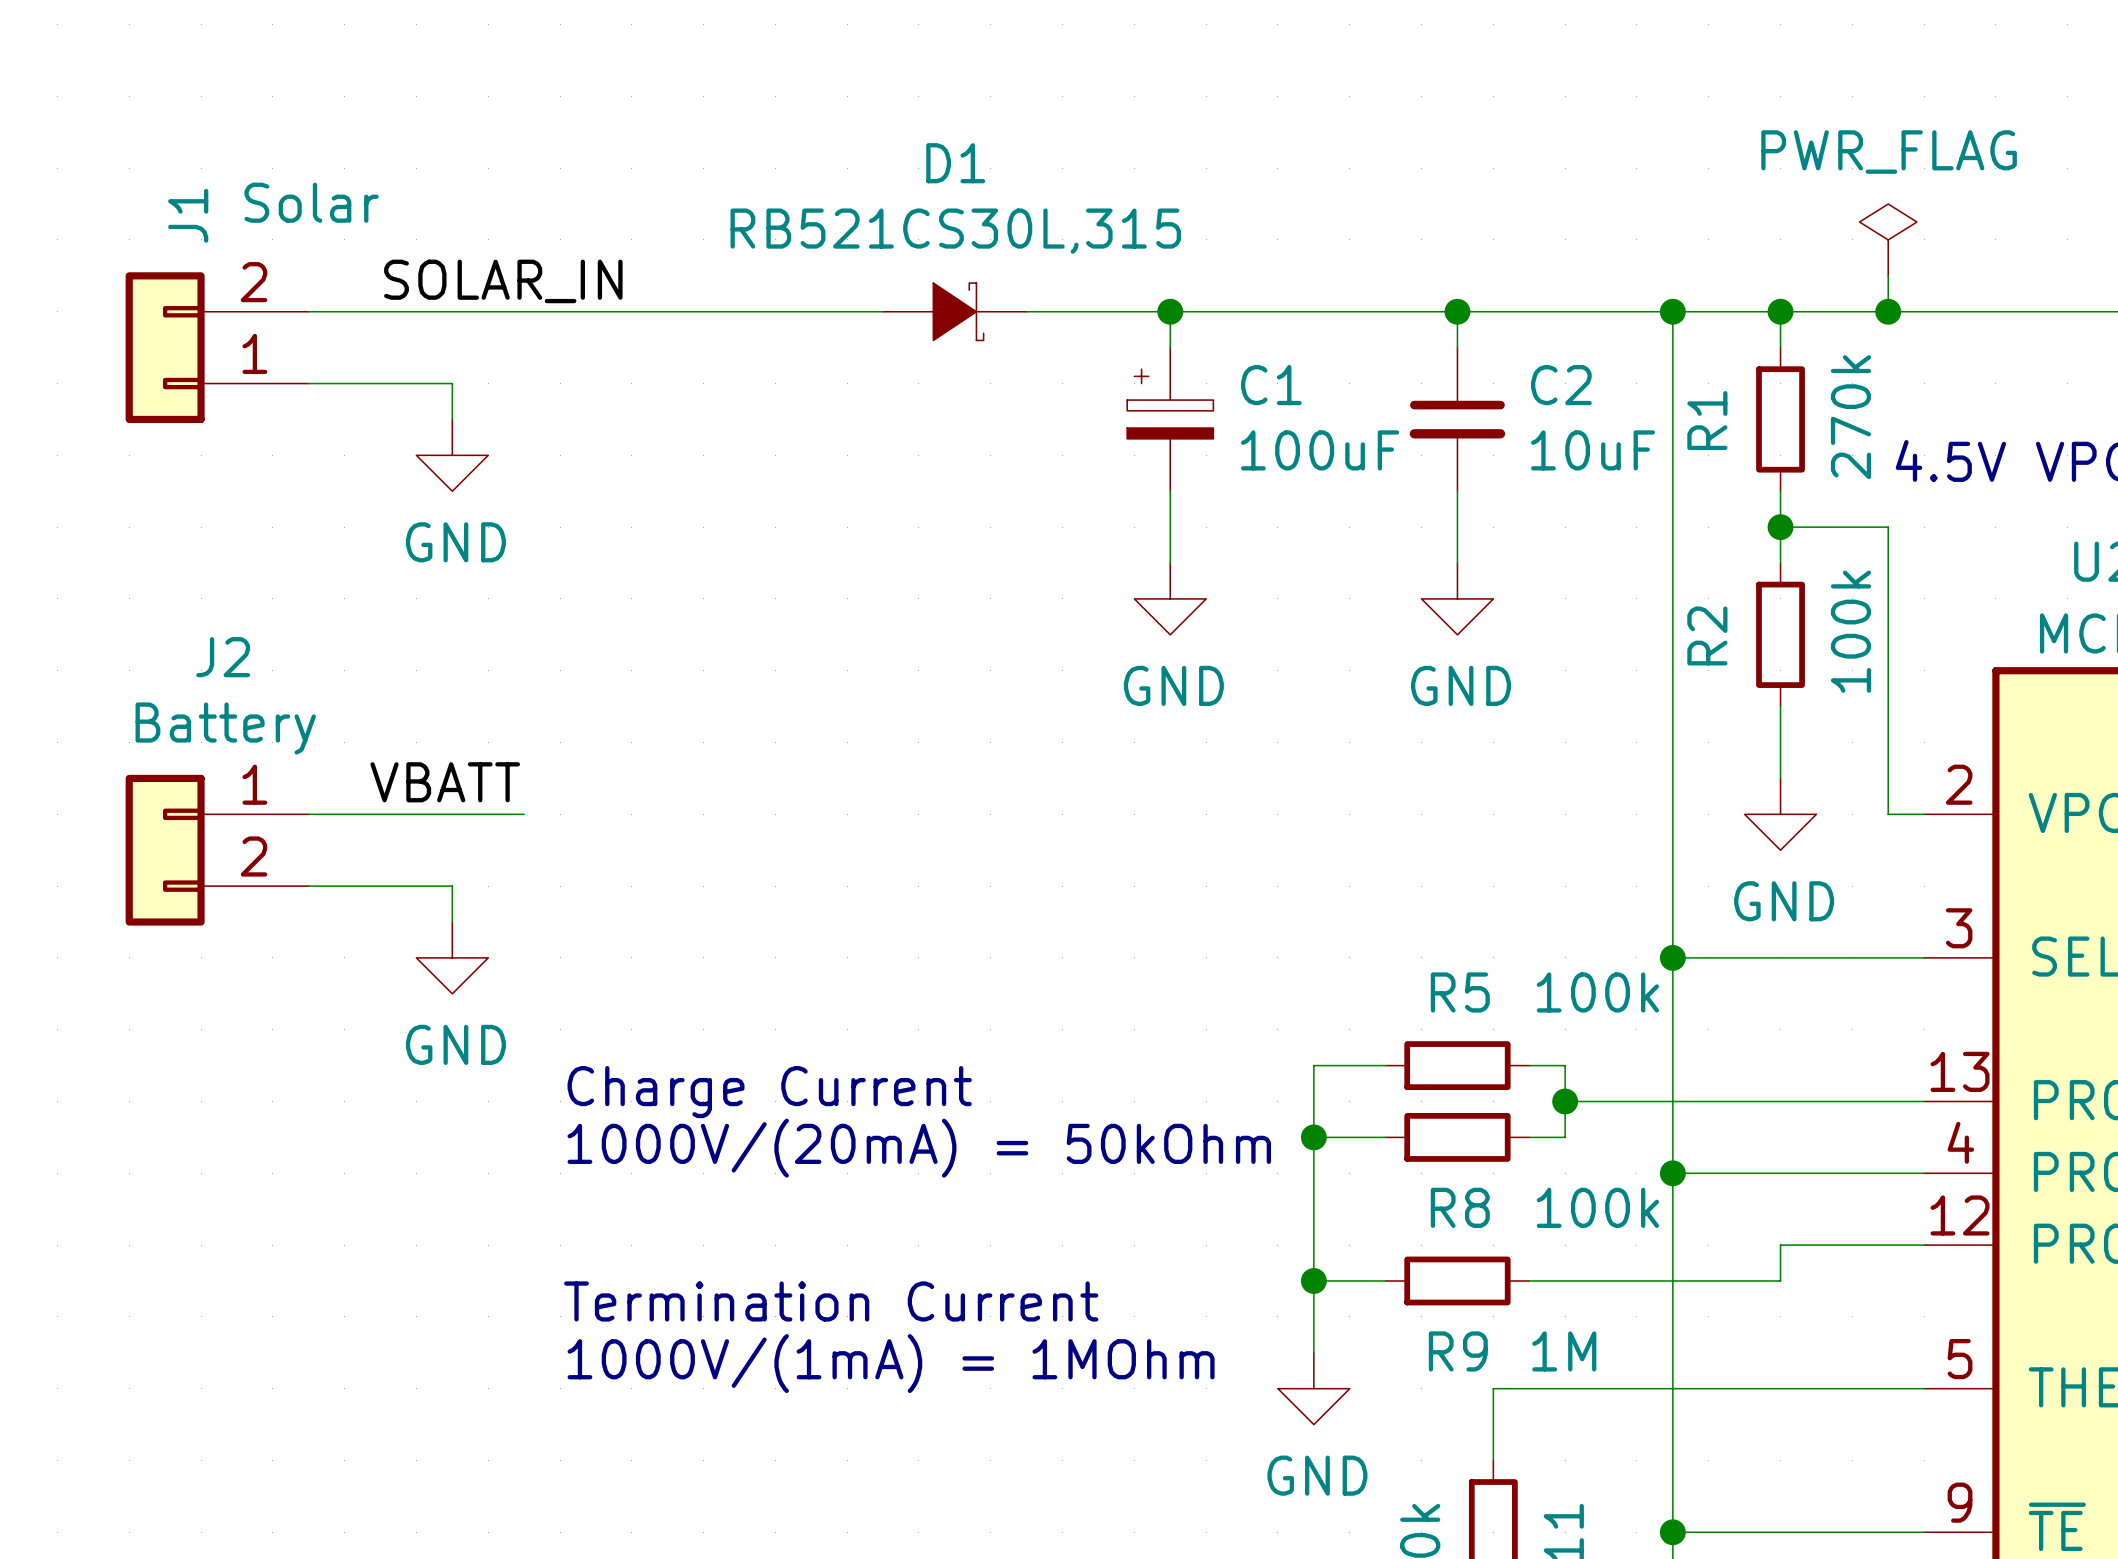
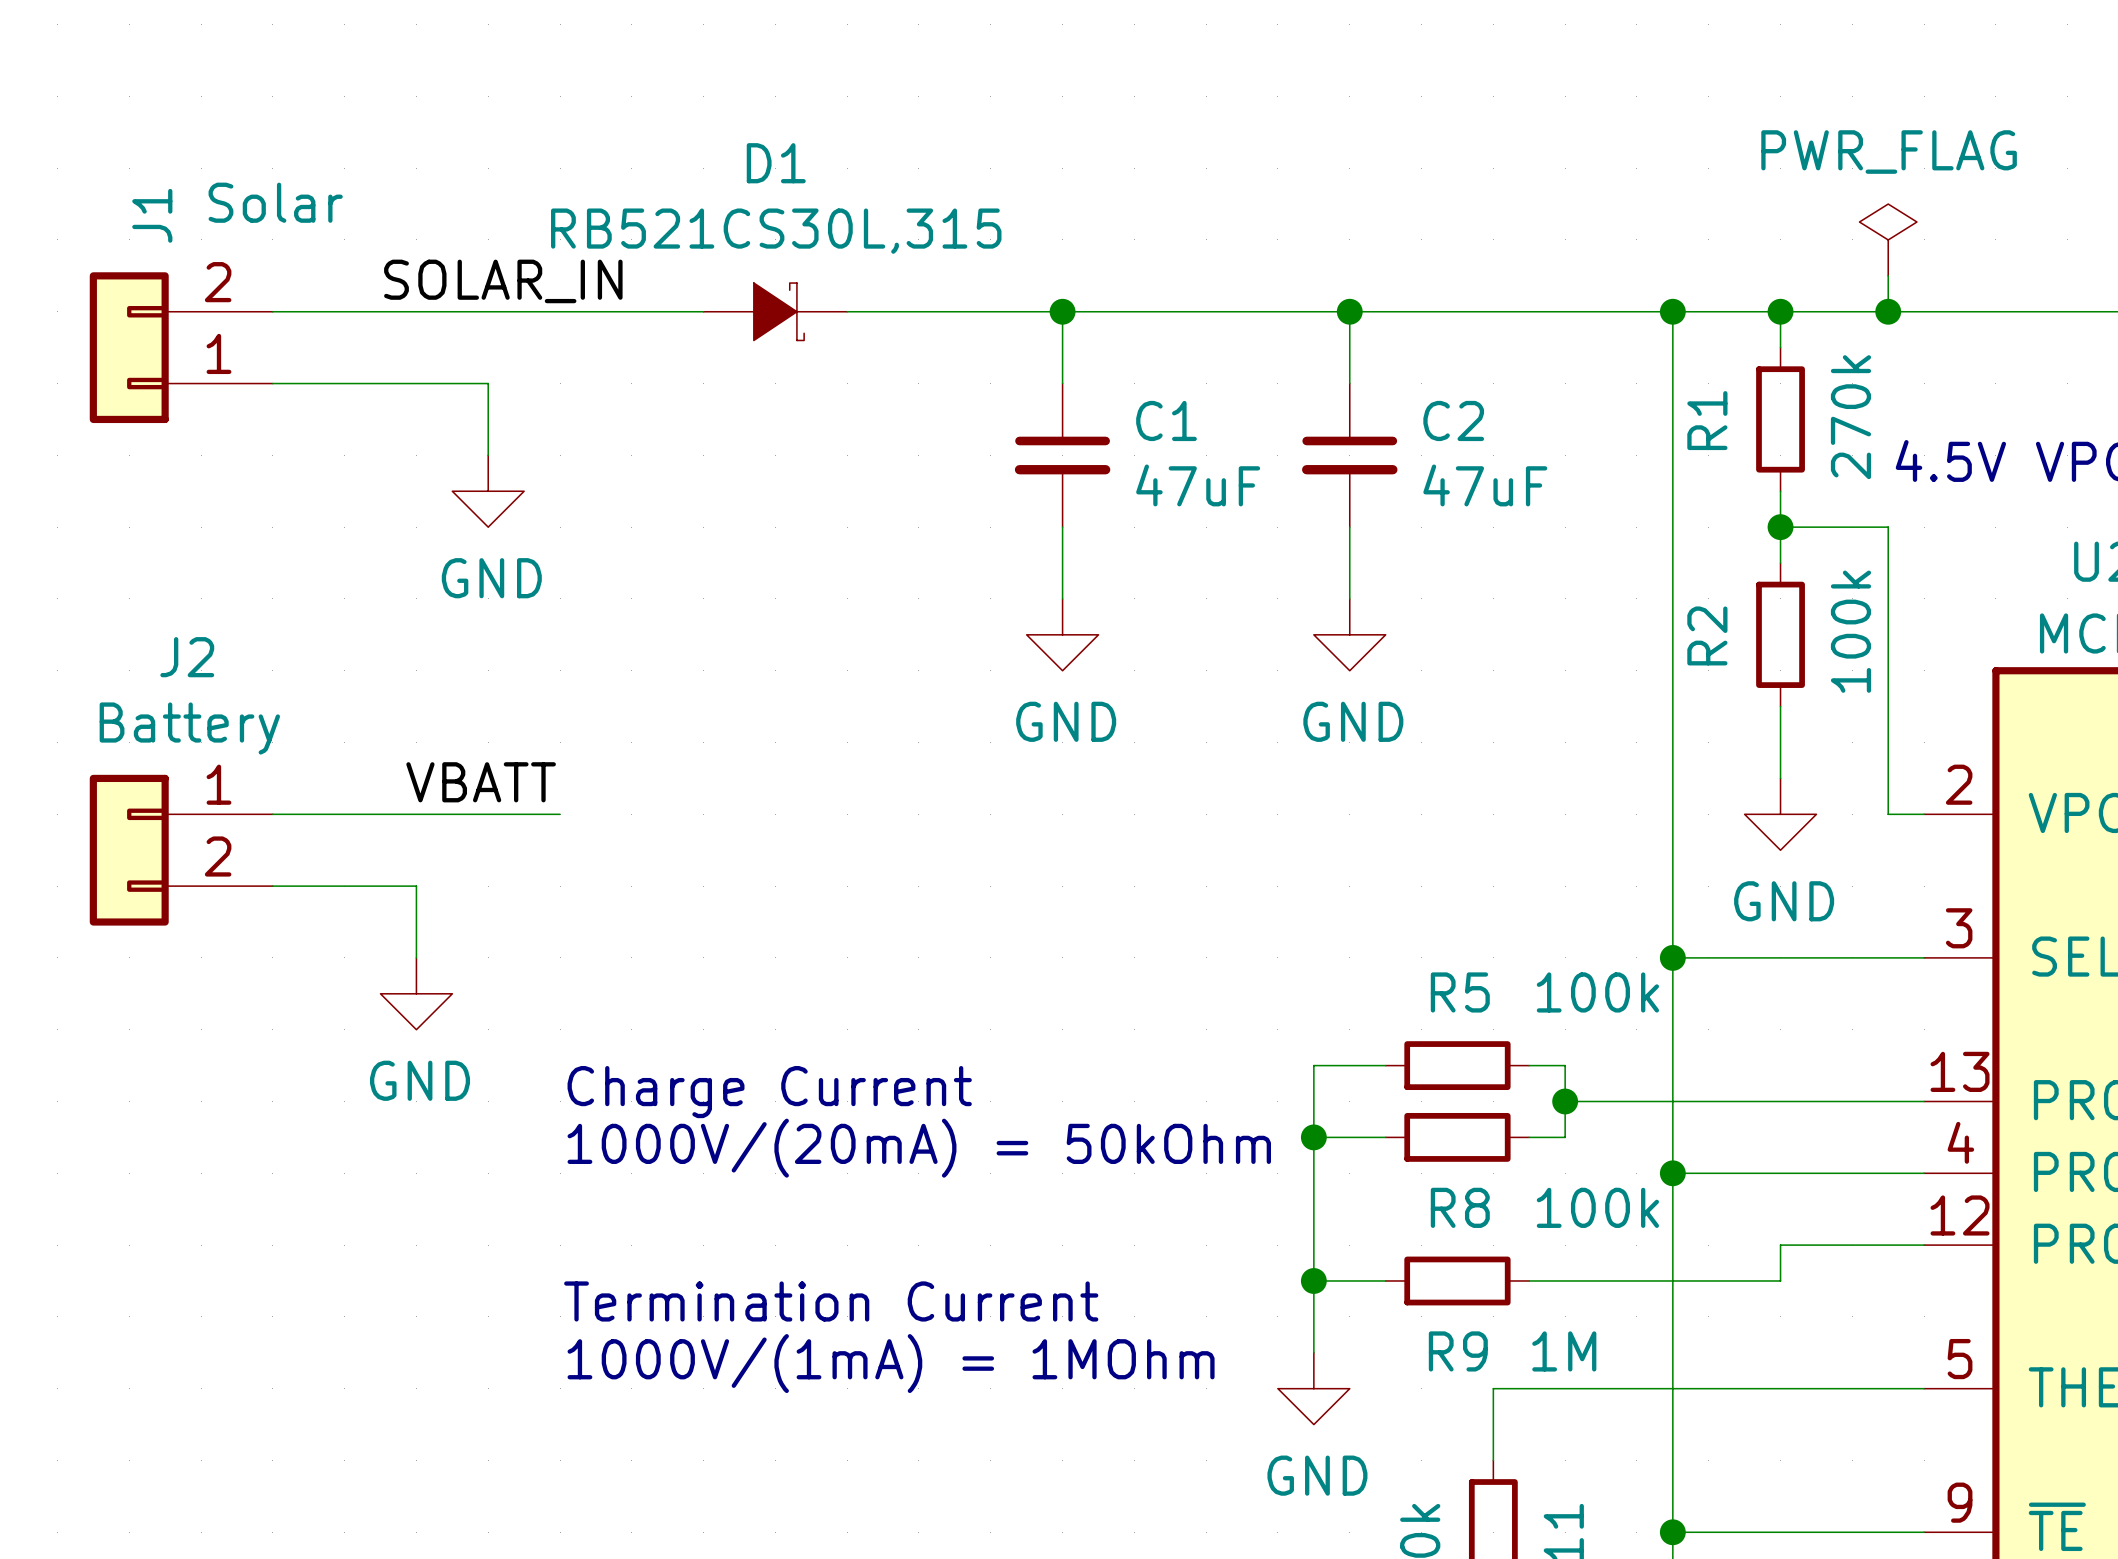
D1 position: (954, 311) -> (775, 311)
wire: none -> (1062, 311) (1062, 383)
junction: none -> (1062, 311)
wire: (1170, 311) (1170, 347) -> none
junction: (1170, 311) -> none
wire: none -> (1349, 311) (1349, 383)
junction: none -> (1349, 311)
wire: (1457, 311) (1457, 347) -> none
junction: (1457, 311) -> none
J1 position: (217, 347) -> (181, 347)
C1 symbol: [1127, 347, 1214, 492] -> [1014, 383, 1111, 528]
wire: (452, 383) (452, 419) -> (452, 383) (488, 383) (488, 455)
C2 position: (1457, 419) -> (1349, 455)
C1 value: 100uF (1320, 450) -> 47uF (1198, 485)
C2 value: 10uF (1593, 450) -> 47uF (1485, 485)
power symbol position: GND (452, 455) -> GND (488, 491)
wire: (1170, 491) (1170, 563) -> (1062, 527) (1062, 598)
wire: (1457, 491) (1457, 563) -> (1349, 527) (1349, 598)
power symbol: GND (1170, 598) -> none
power symbol: GND (1457, 598) -> none
power symbol: none -> GND (1062, 634)
power symbol: none -> GND (1349, 634)
label position: VBATT (445, 782) -> VBATT (481, 782)
wire: none -> (524, 814) (560, 814)
J2 position: (217, 850) -> (181, 850)
wire: (416, 886) (452, 886) (452, 922) -> (416, 886) (416, 957)
power symbol position: GND (452, 957) -> GND (416, 993)

